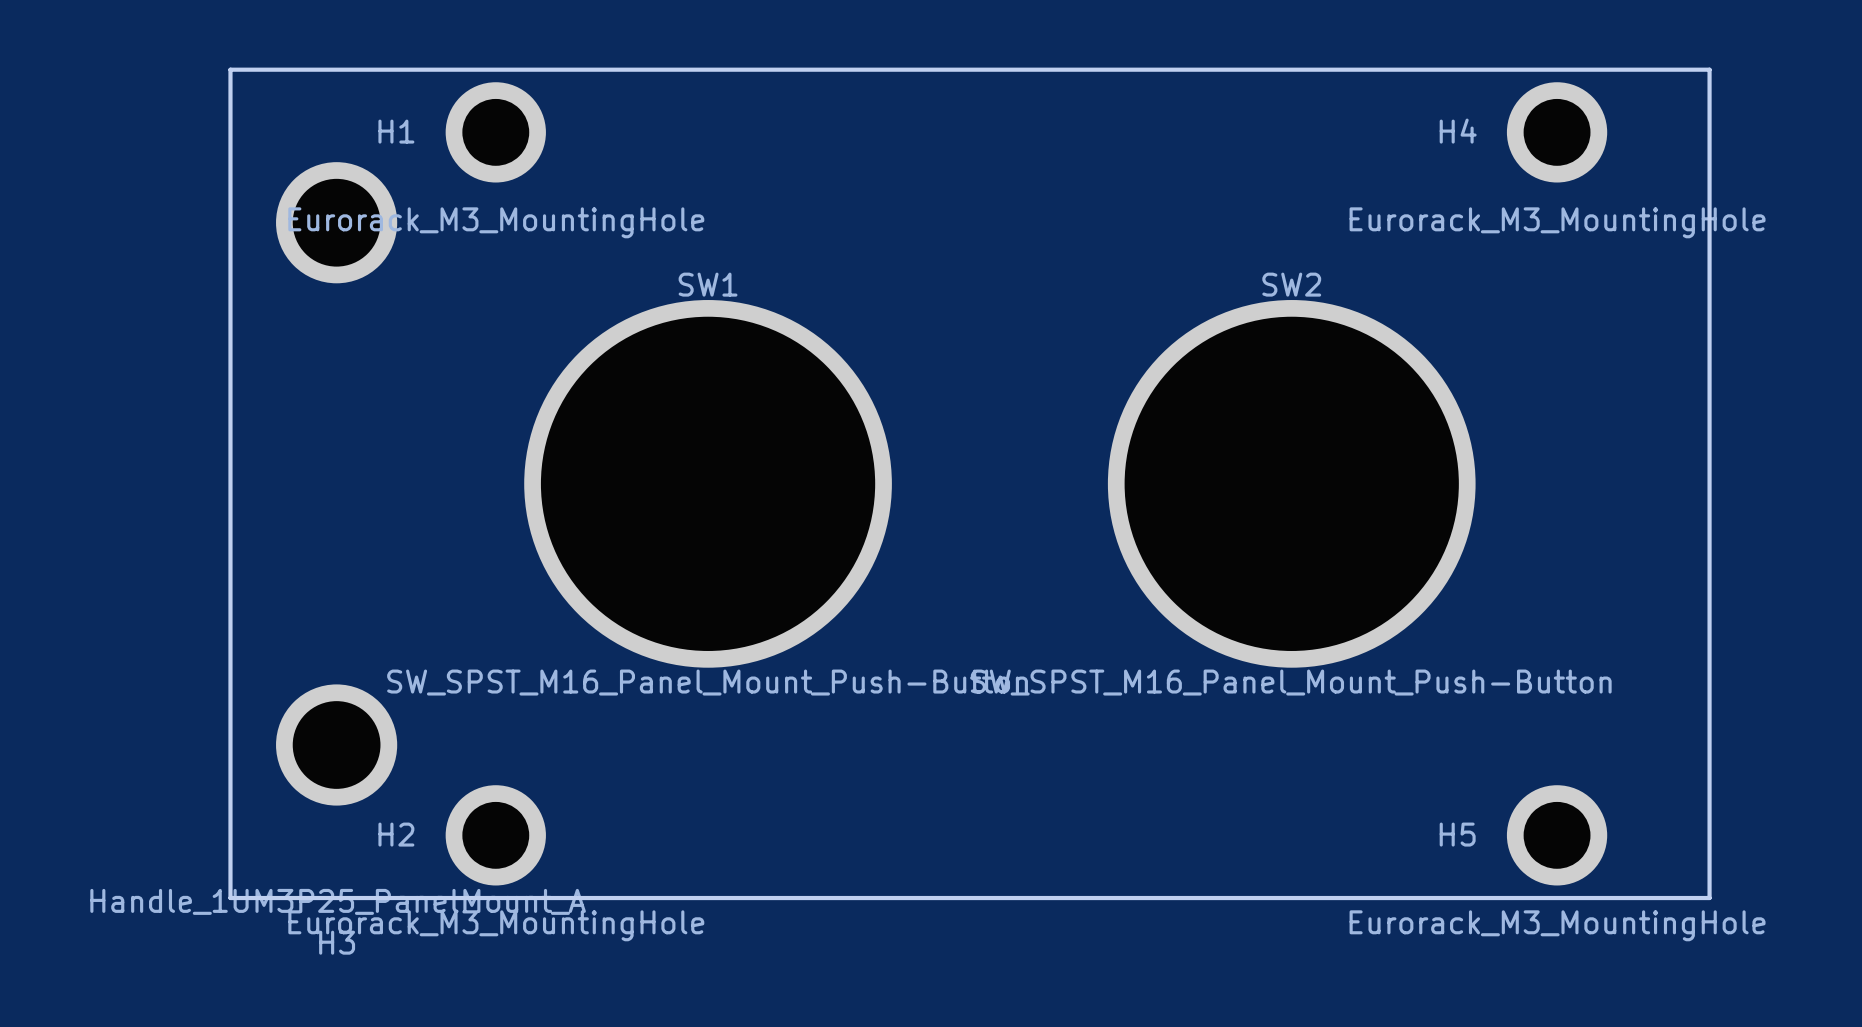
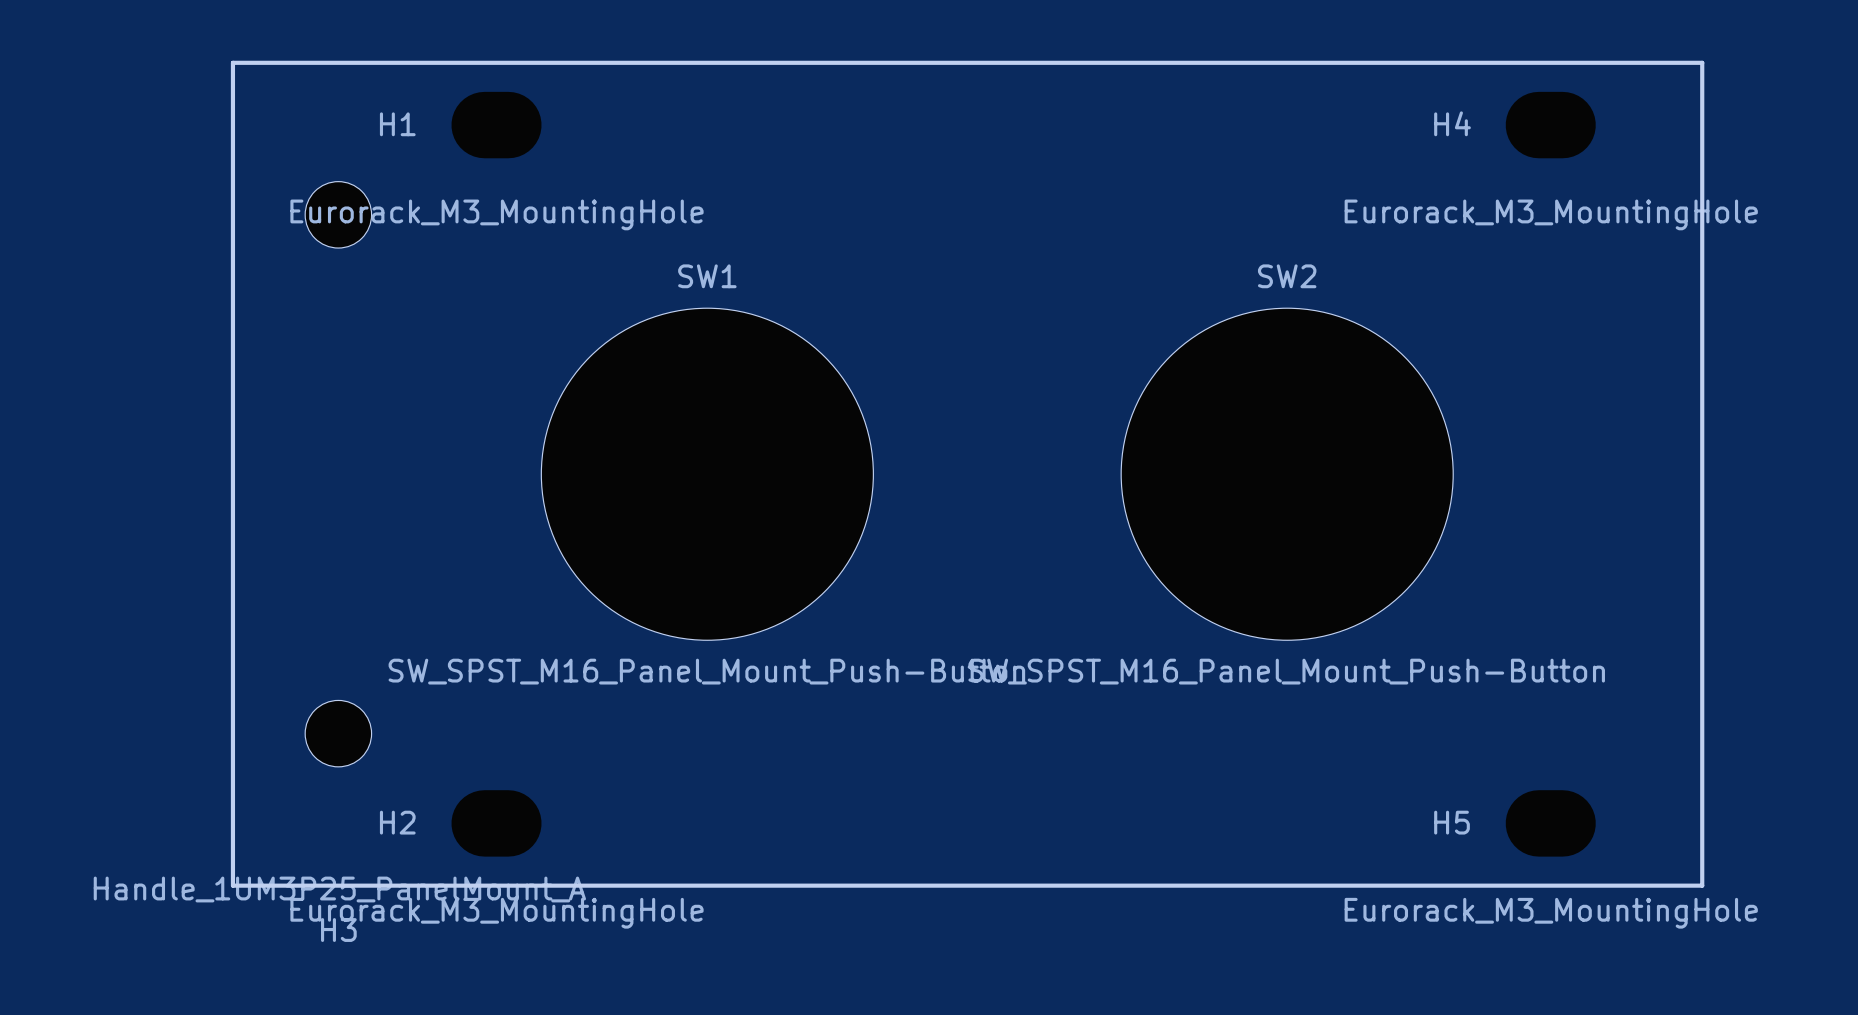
H1 footprint: [445, 82, 546, 183] -> [451, 91, 542, 159]
H4 footprint: [1506, 82, 1608, 183] -> [1505, 91, 1596, 159]
H3 footprint: [276, 162, 398, 806] -> [305, 181, 372, 767]
SW1 footprint: [524, 300, 892, 668] -> [541, 308, 874, 641]
SW2 footprint: [1107, 300, 1476, 668] -> [1121, 308, 1454, 641]
H2 footprint: [445, 785, 546, 886] -> [451, 790, 542, 857]
H5 footprint: [1506, 785, 1608, 886] -> [1505, 790, 1596, 857]

